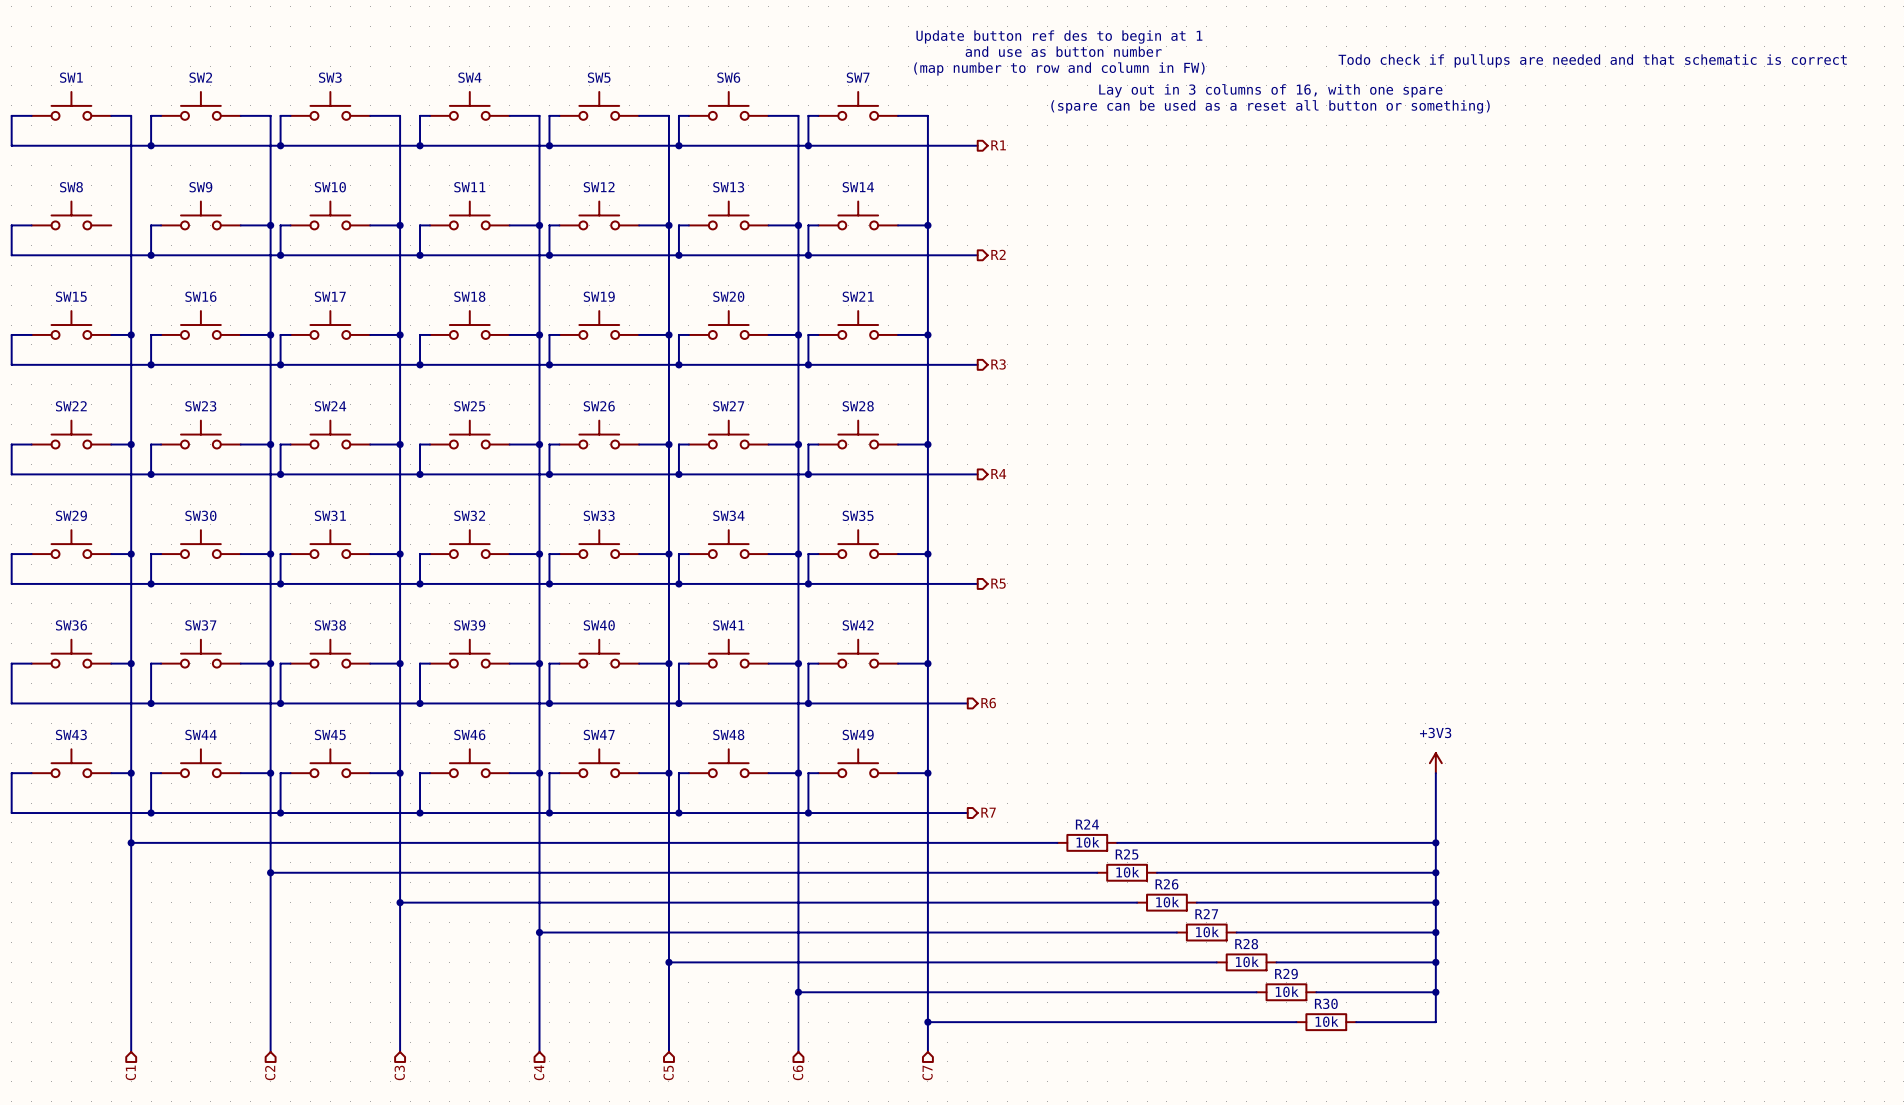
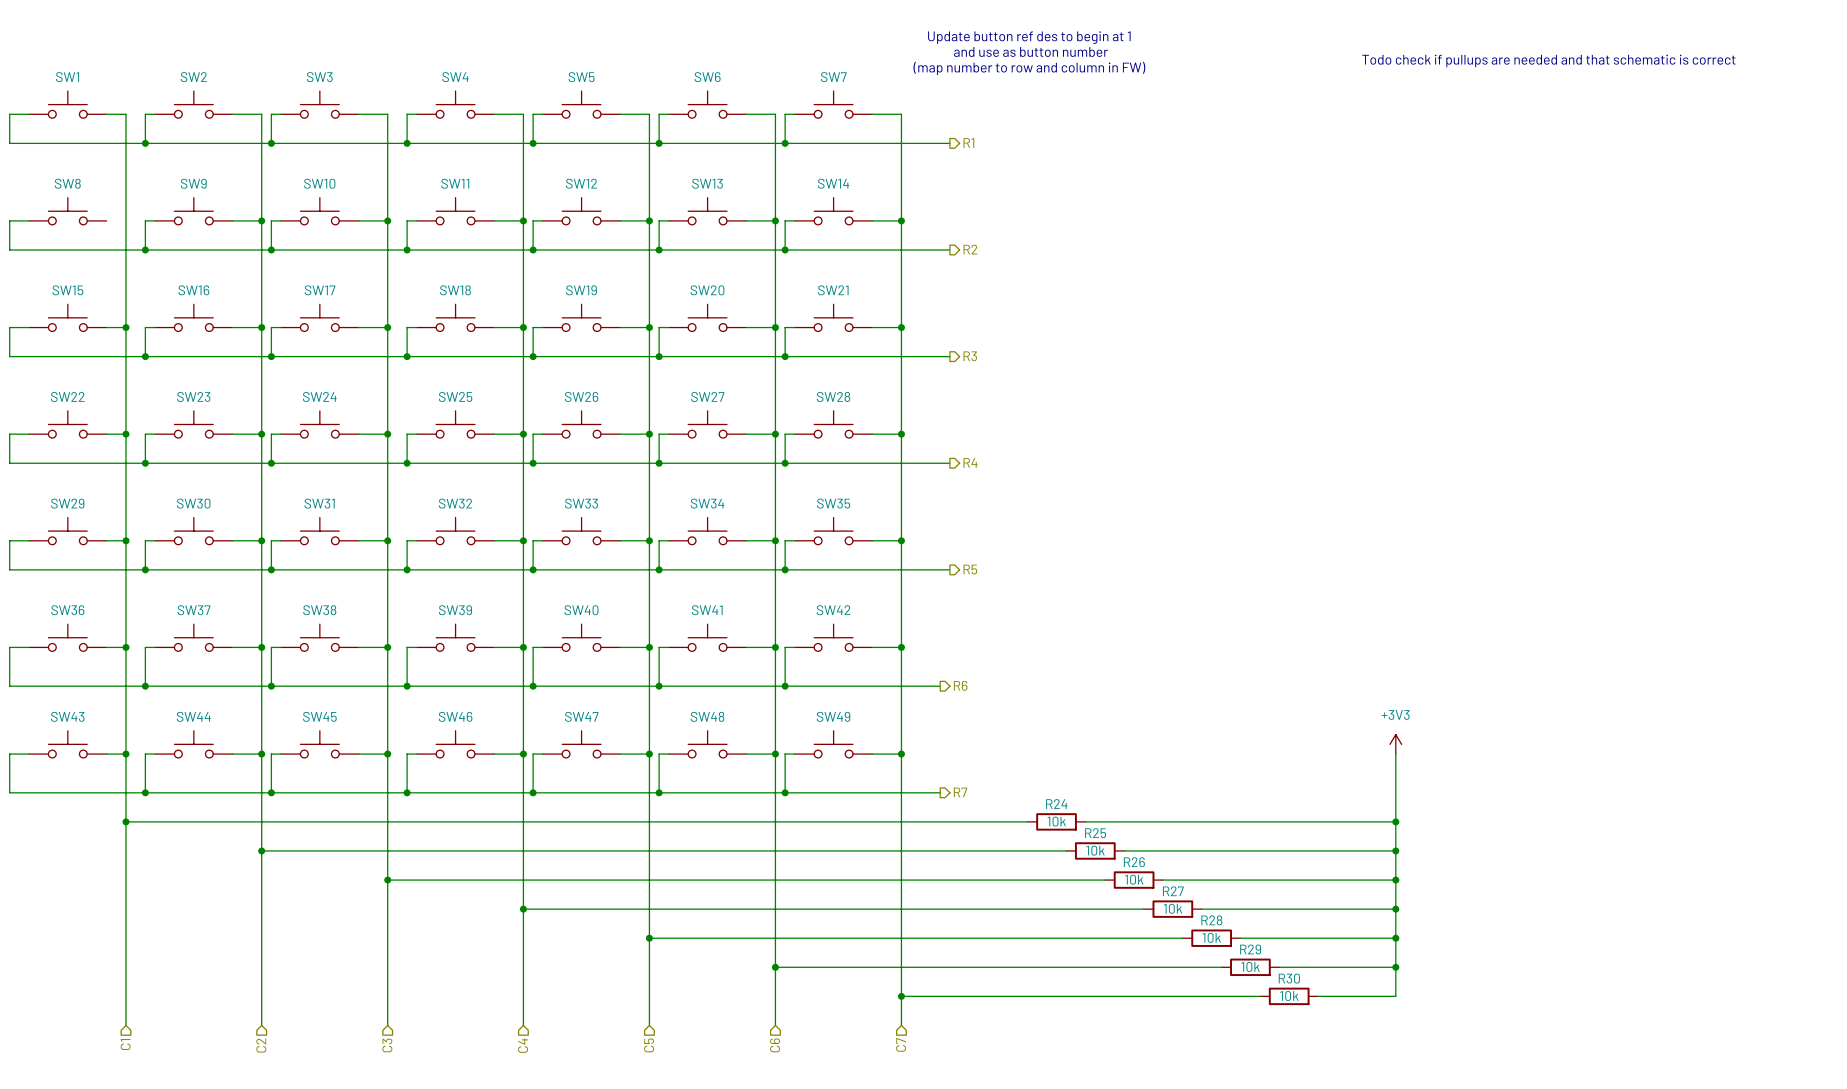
text: Lay out in 3 columns of 16, with one spare (1270, 90) -> none
text: (spare can be used as a reset all button or something) (1270, 106) -> none

